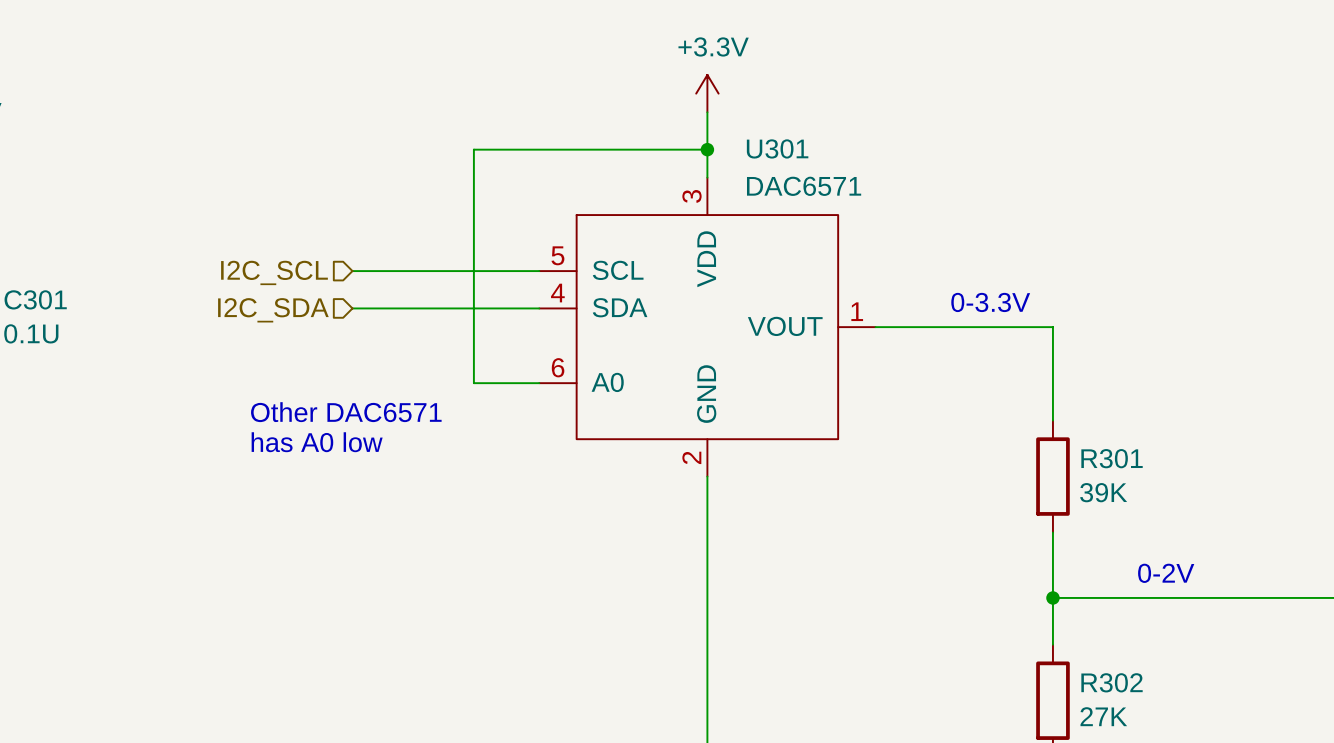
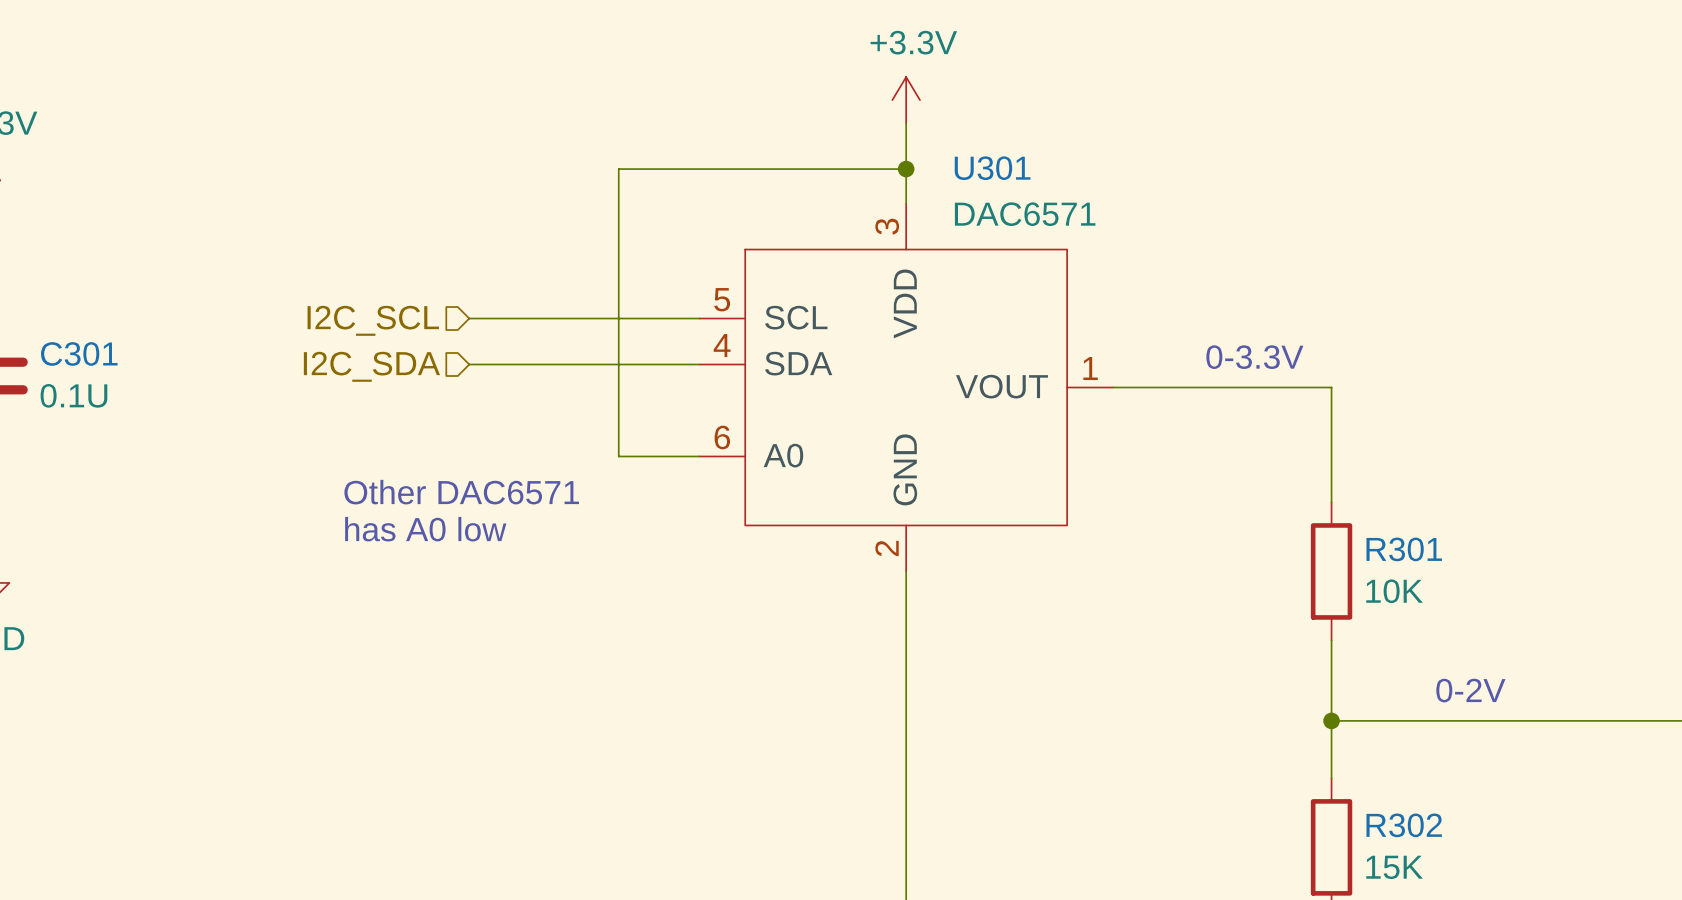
R301 value: 39K (1103, 492) -> 10K (1394, 591)
R302 value: 27K (1103, 716) -> 15K (1394, 867)

